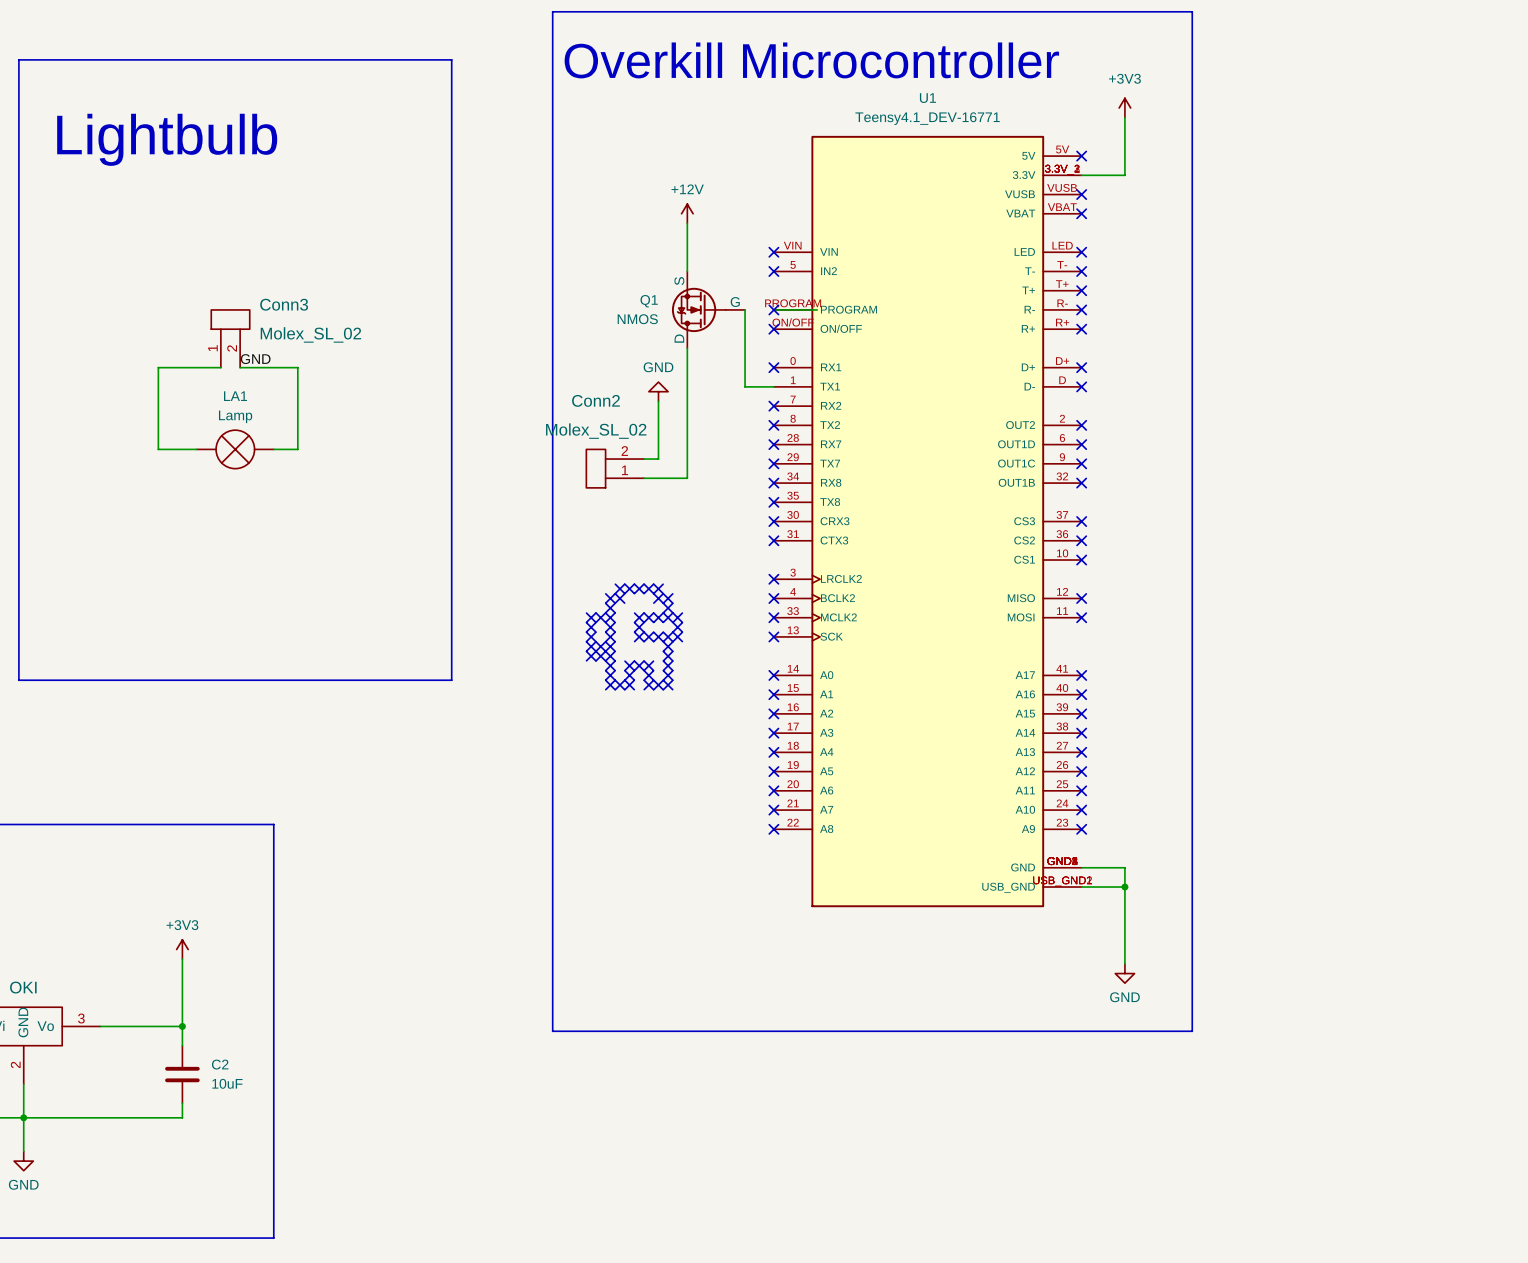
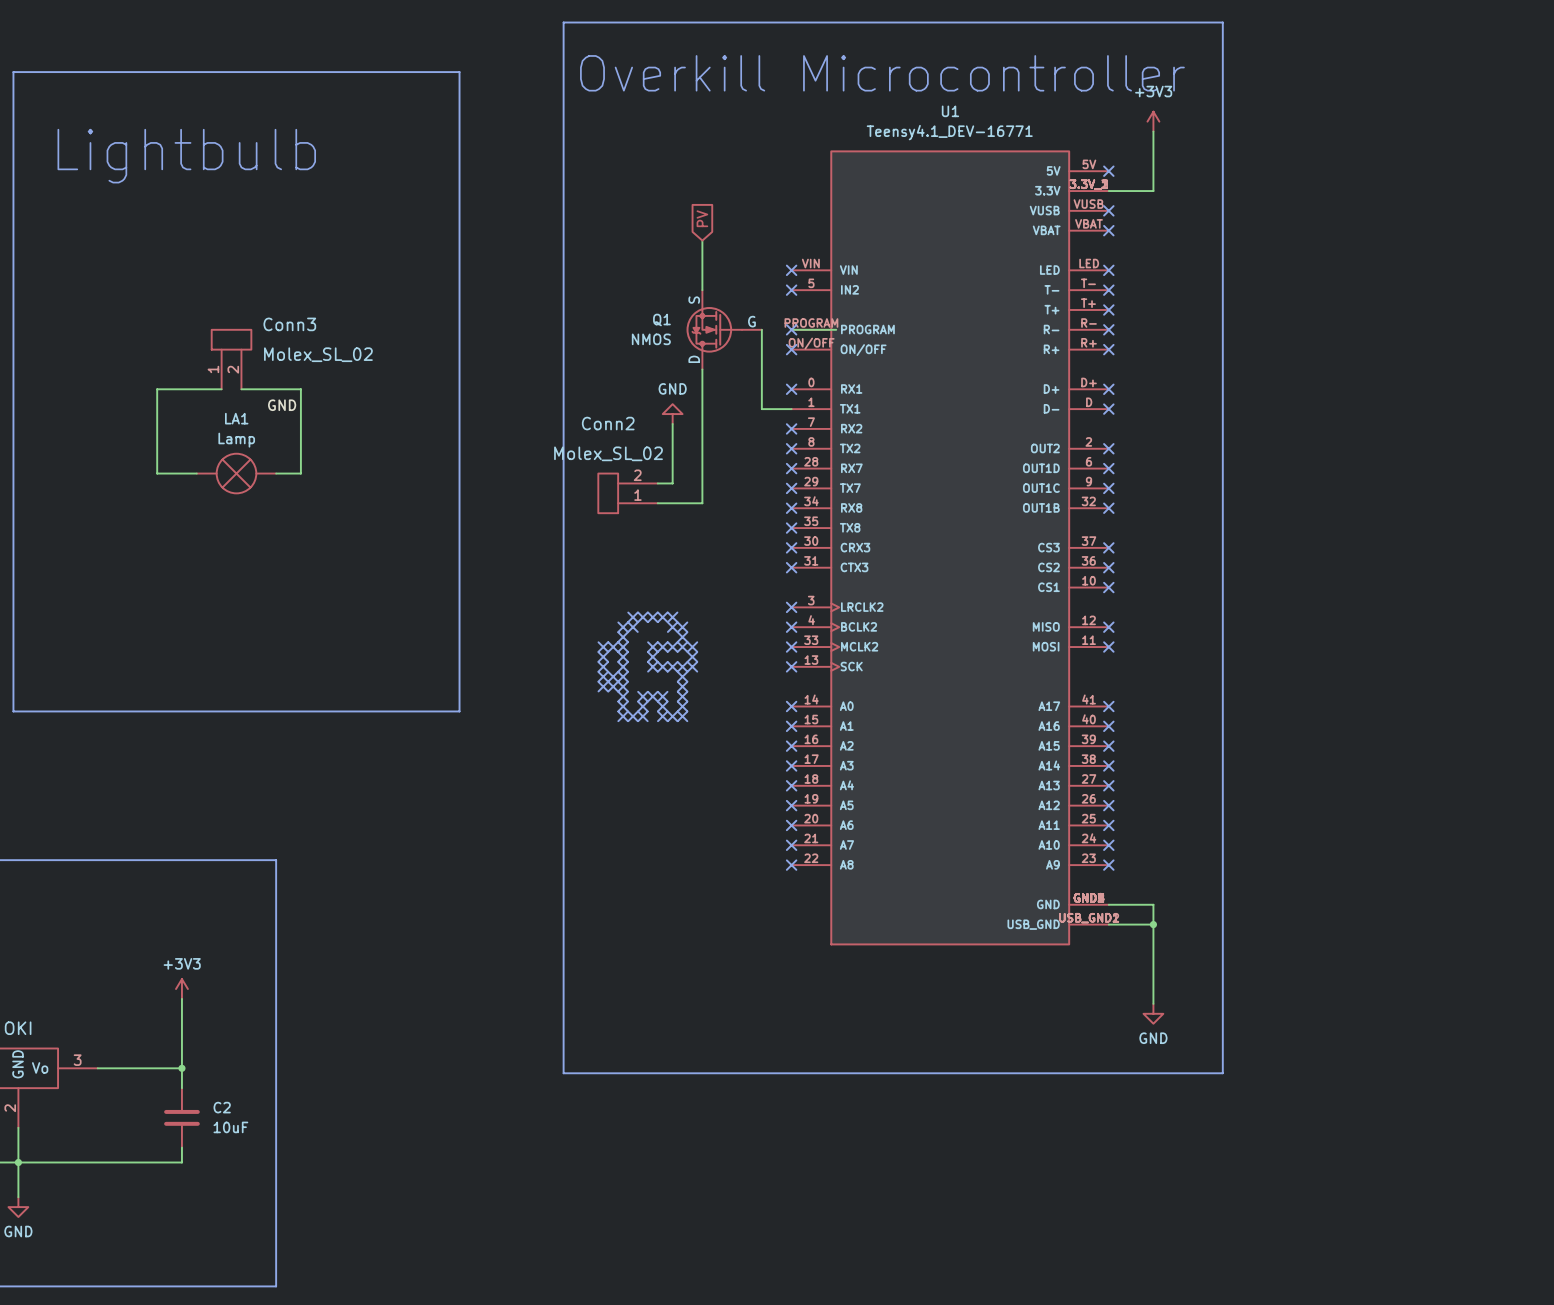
global label: none -> PV (702, 218)
power symbol: +12V (687, 213) -> none
label position: GND (255, 359) -> GND (282, 405)

